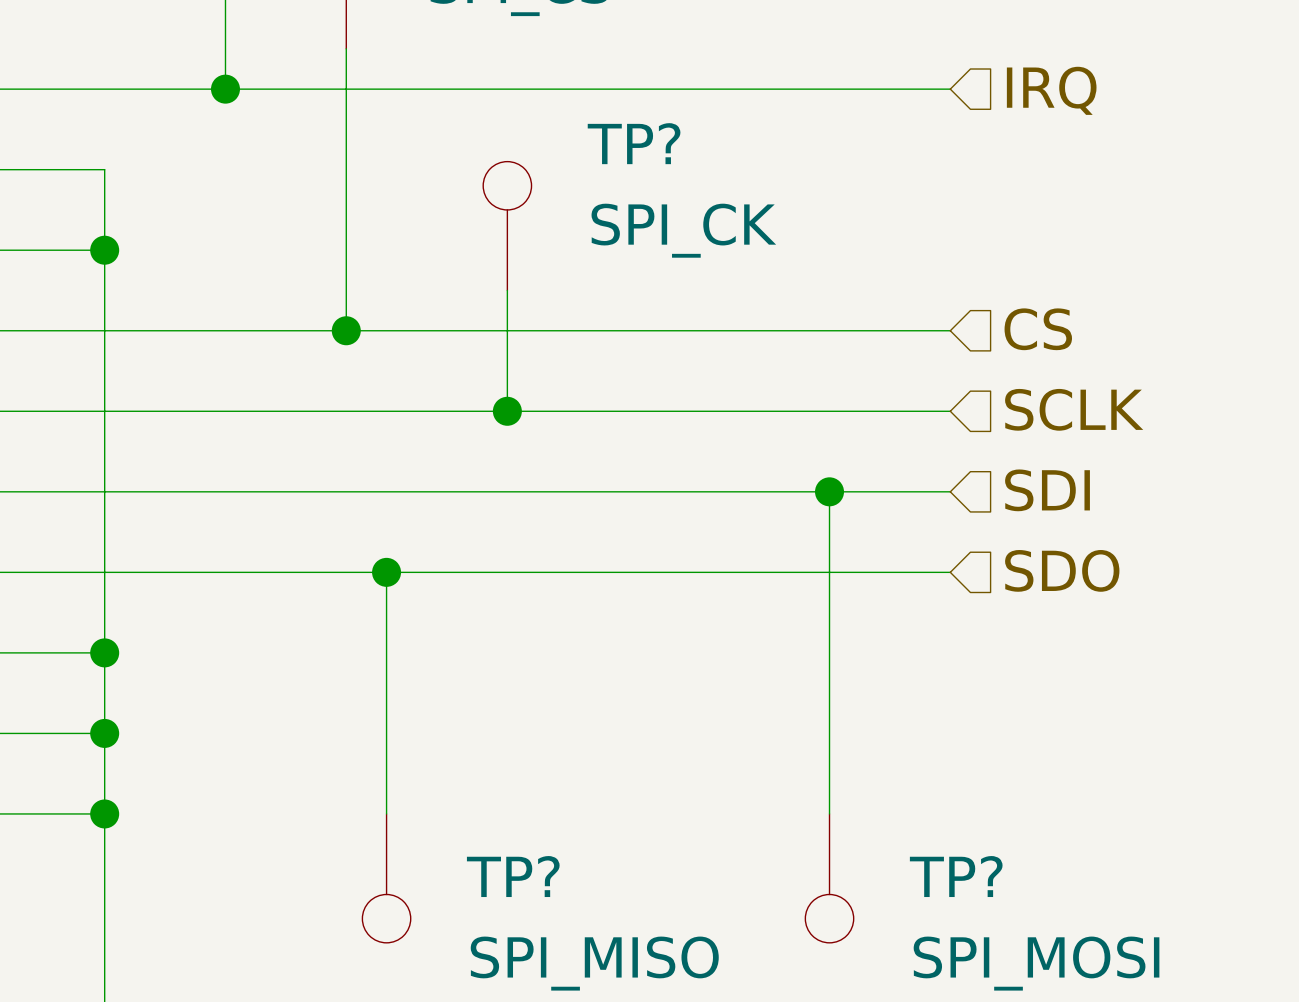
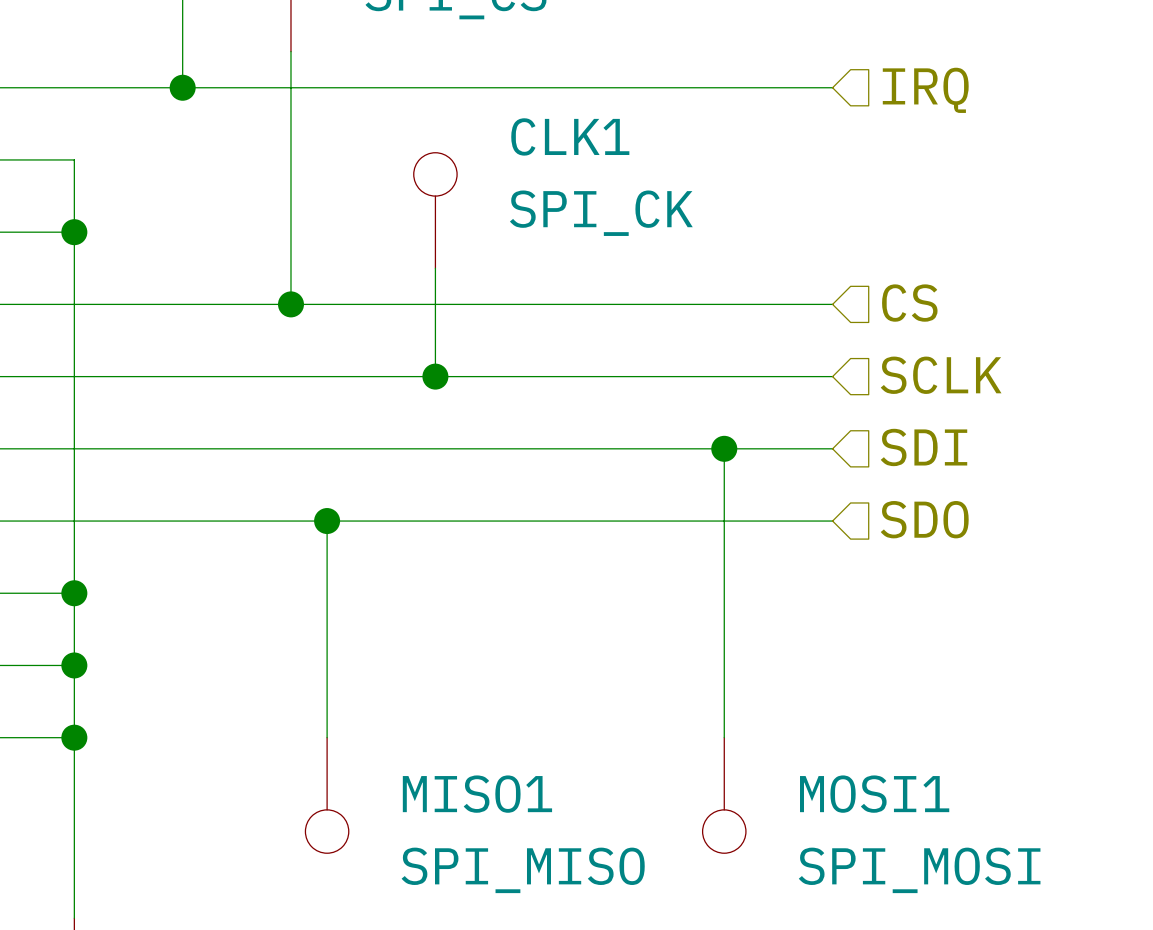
TP? name: TP? (634, 143) -> CLK1 (570, 136)
TP? name: TP? (513, 876) -> MISO1 (477, 794)
TP? name: TP? (956, 876) -> MOSI1 (874, 794)

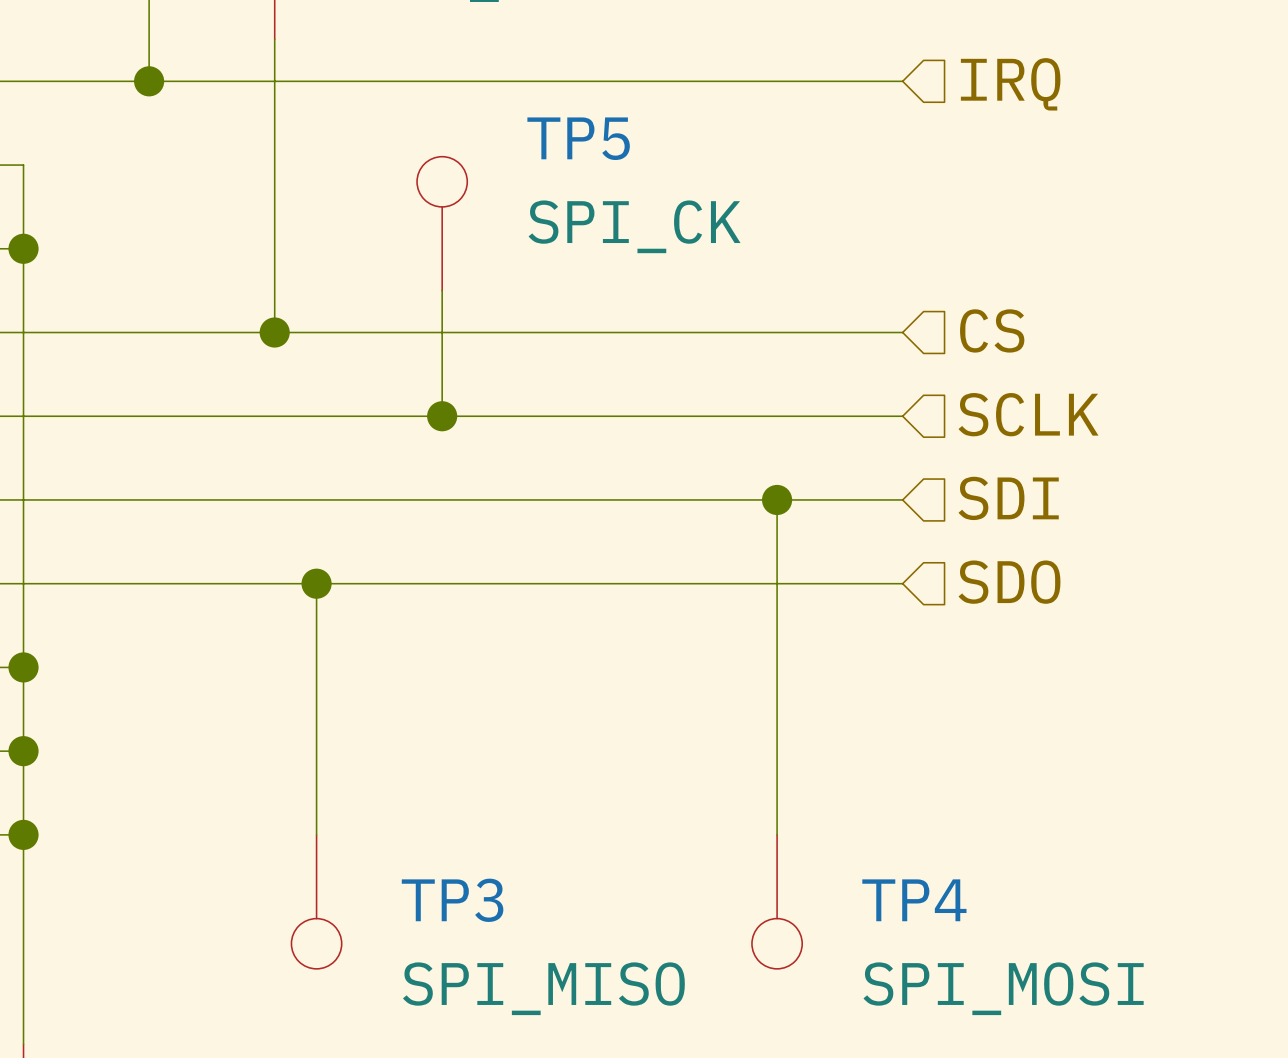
CLK1 name: CLK1 (570, 136) -> TP5 (578, 138)
MISO1 name: MISO1 (477, 794) -> TP3 (452, 900)
MOSI1 name: MOSI1 (874, 794) -> TP4 (914, 900)

